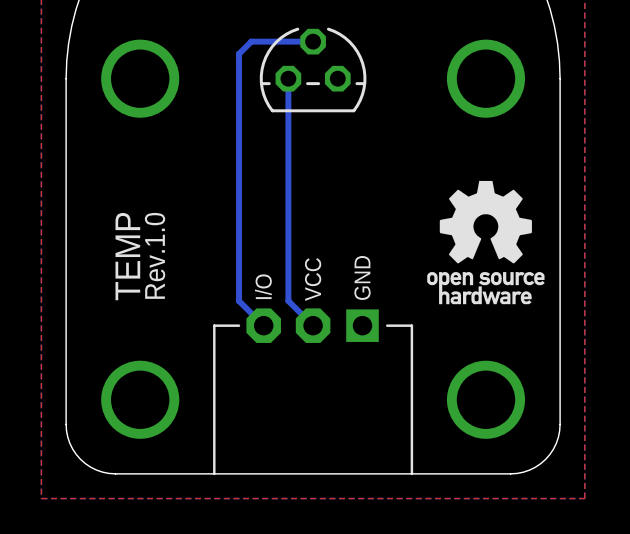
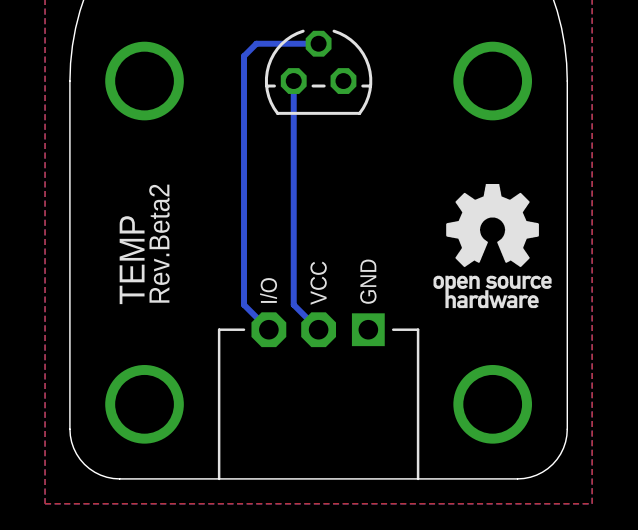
text: Rev.1.0 (155, 255) -> Rev.Beta2 (159, 243)

